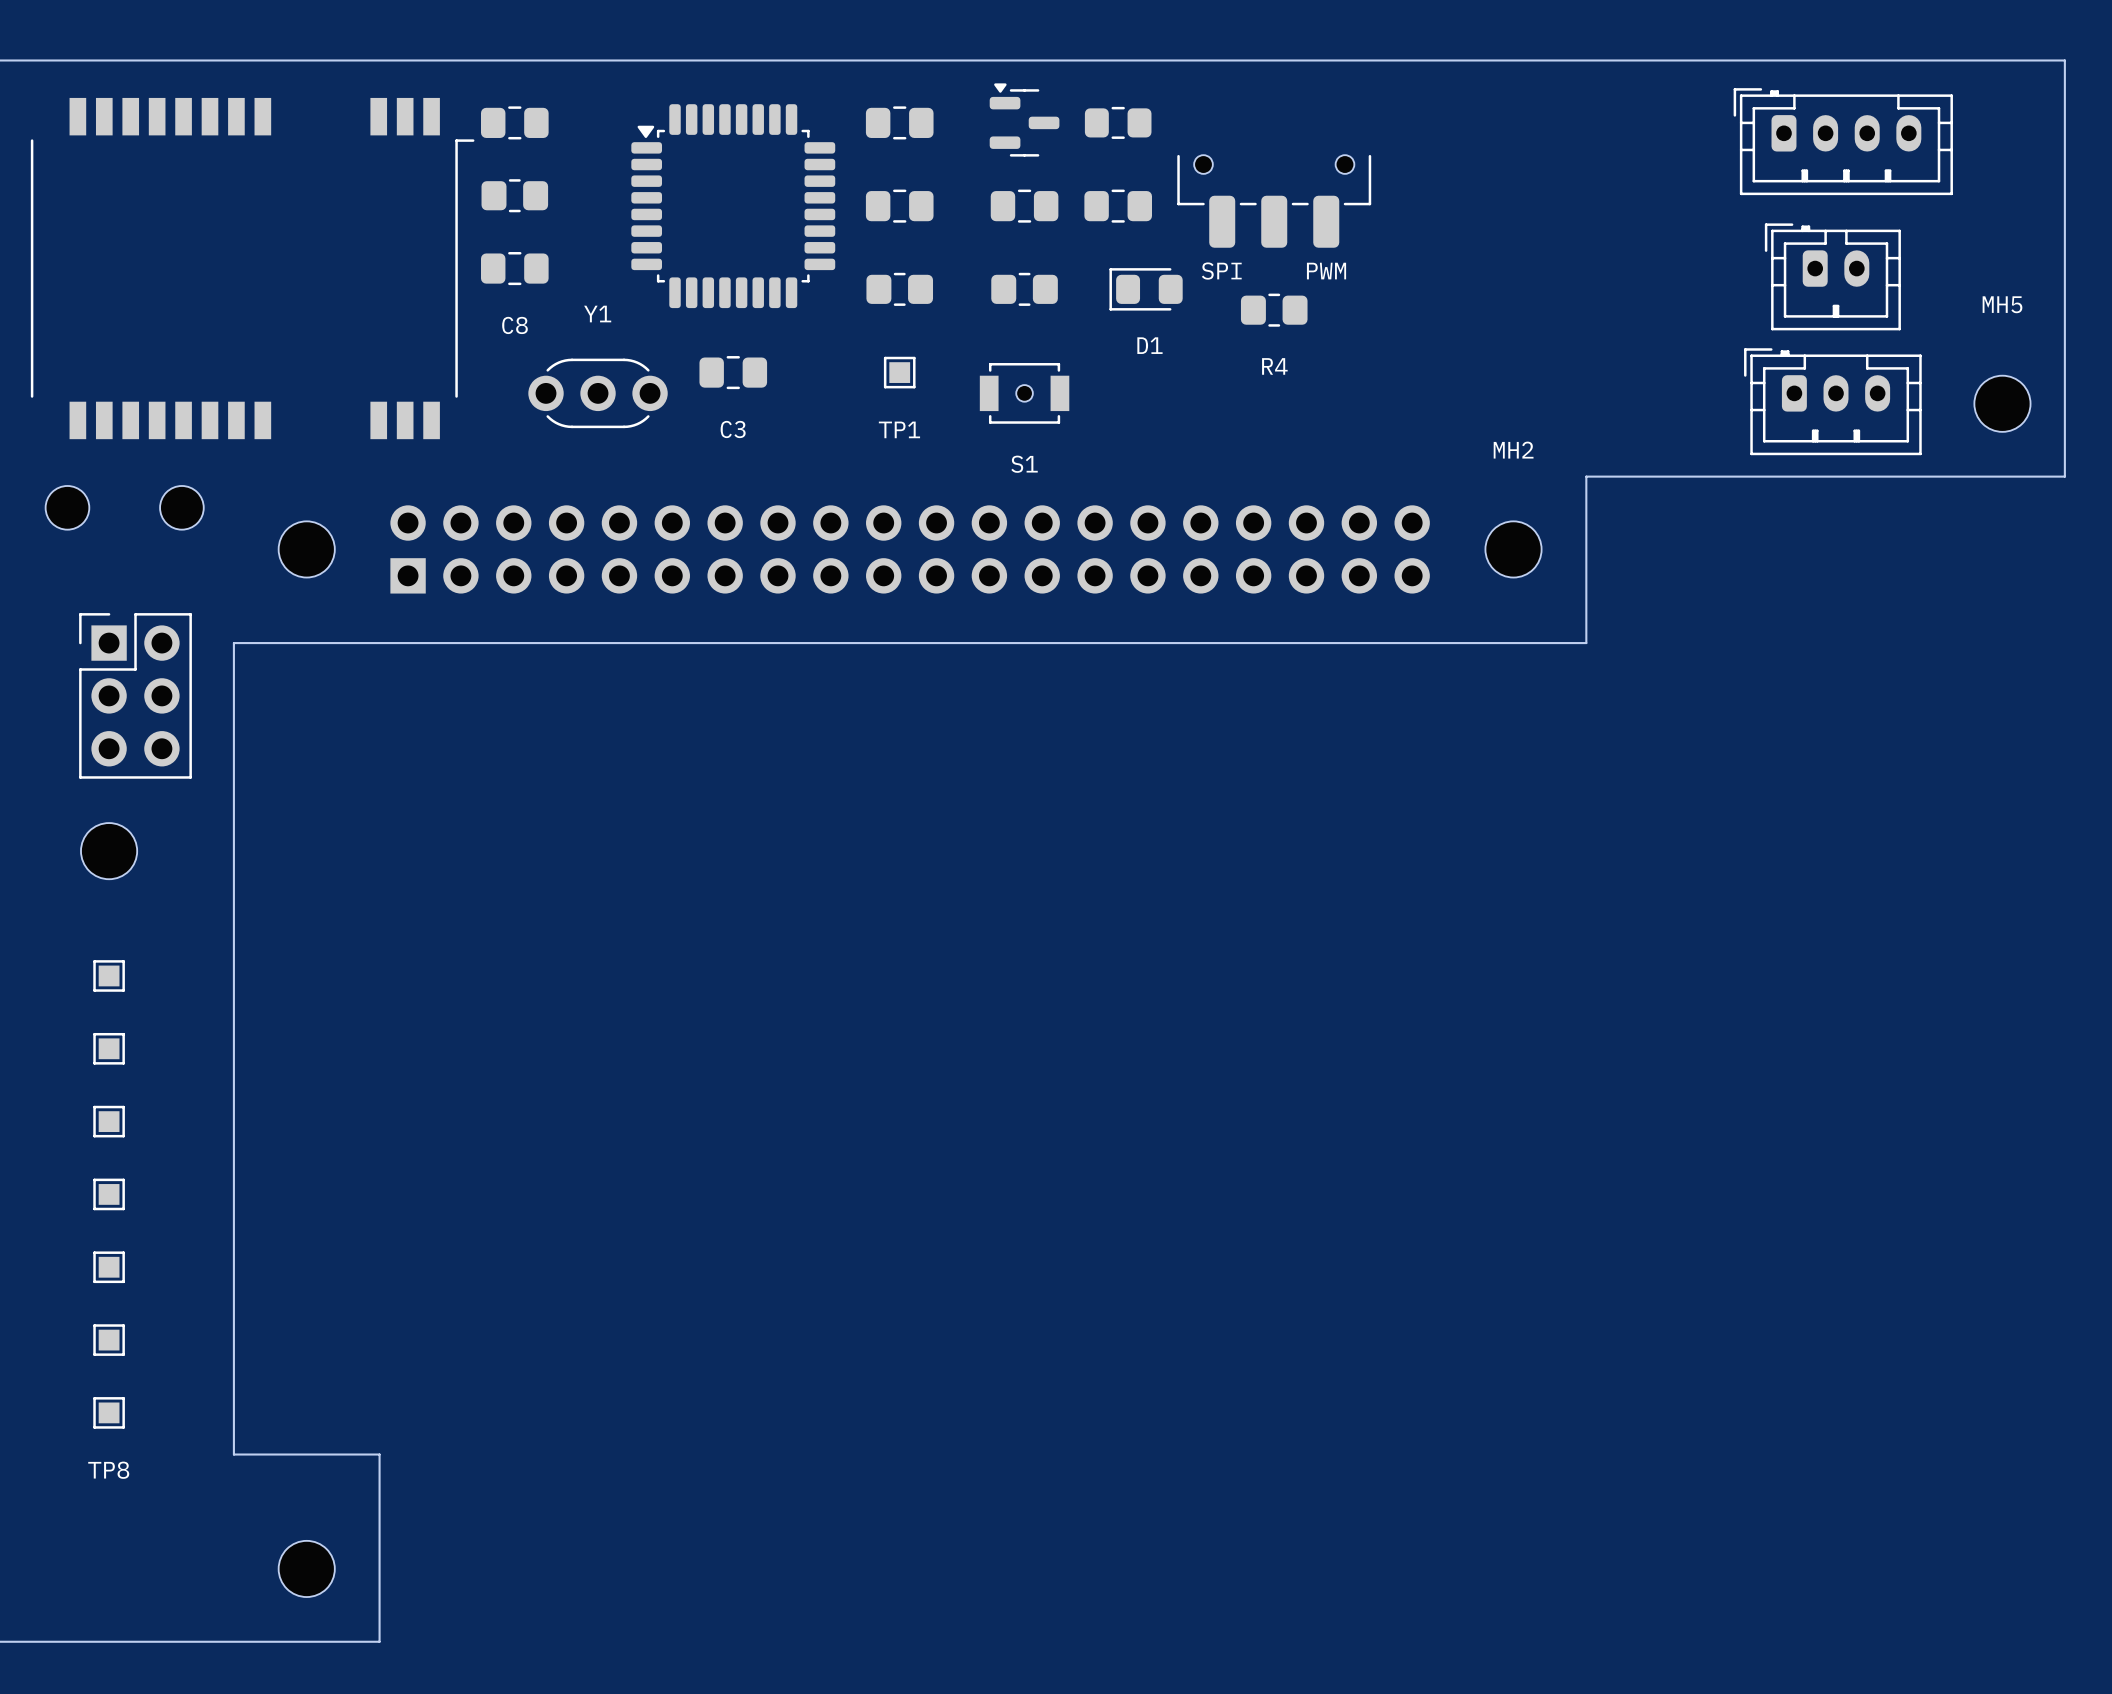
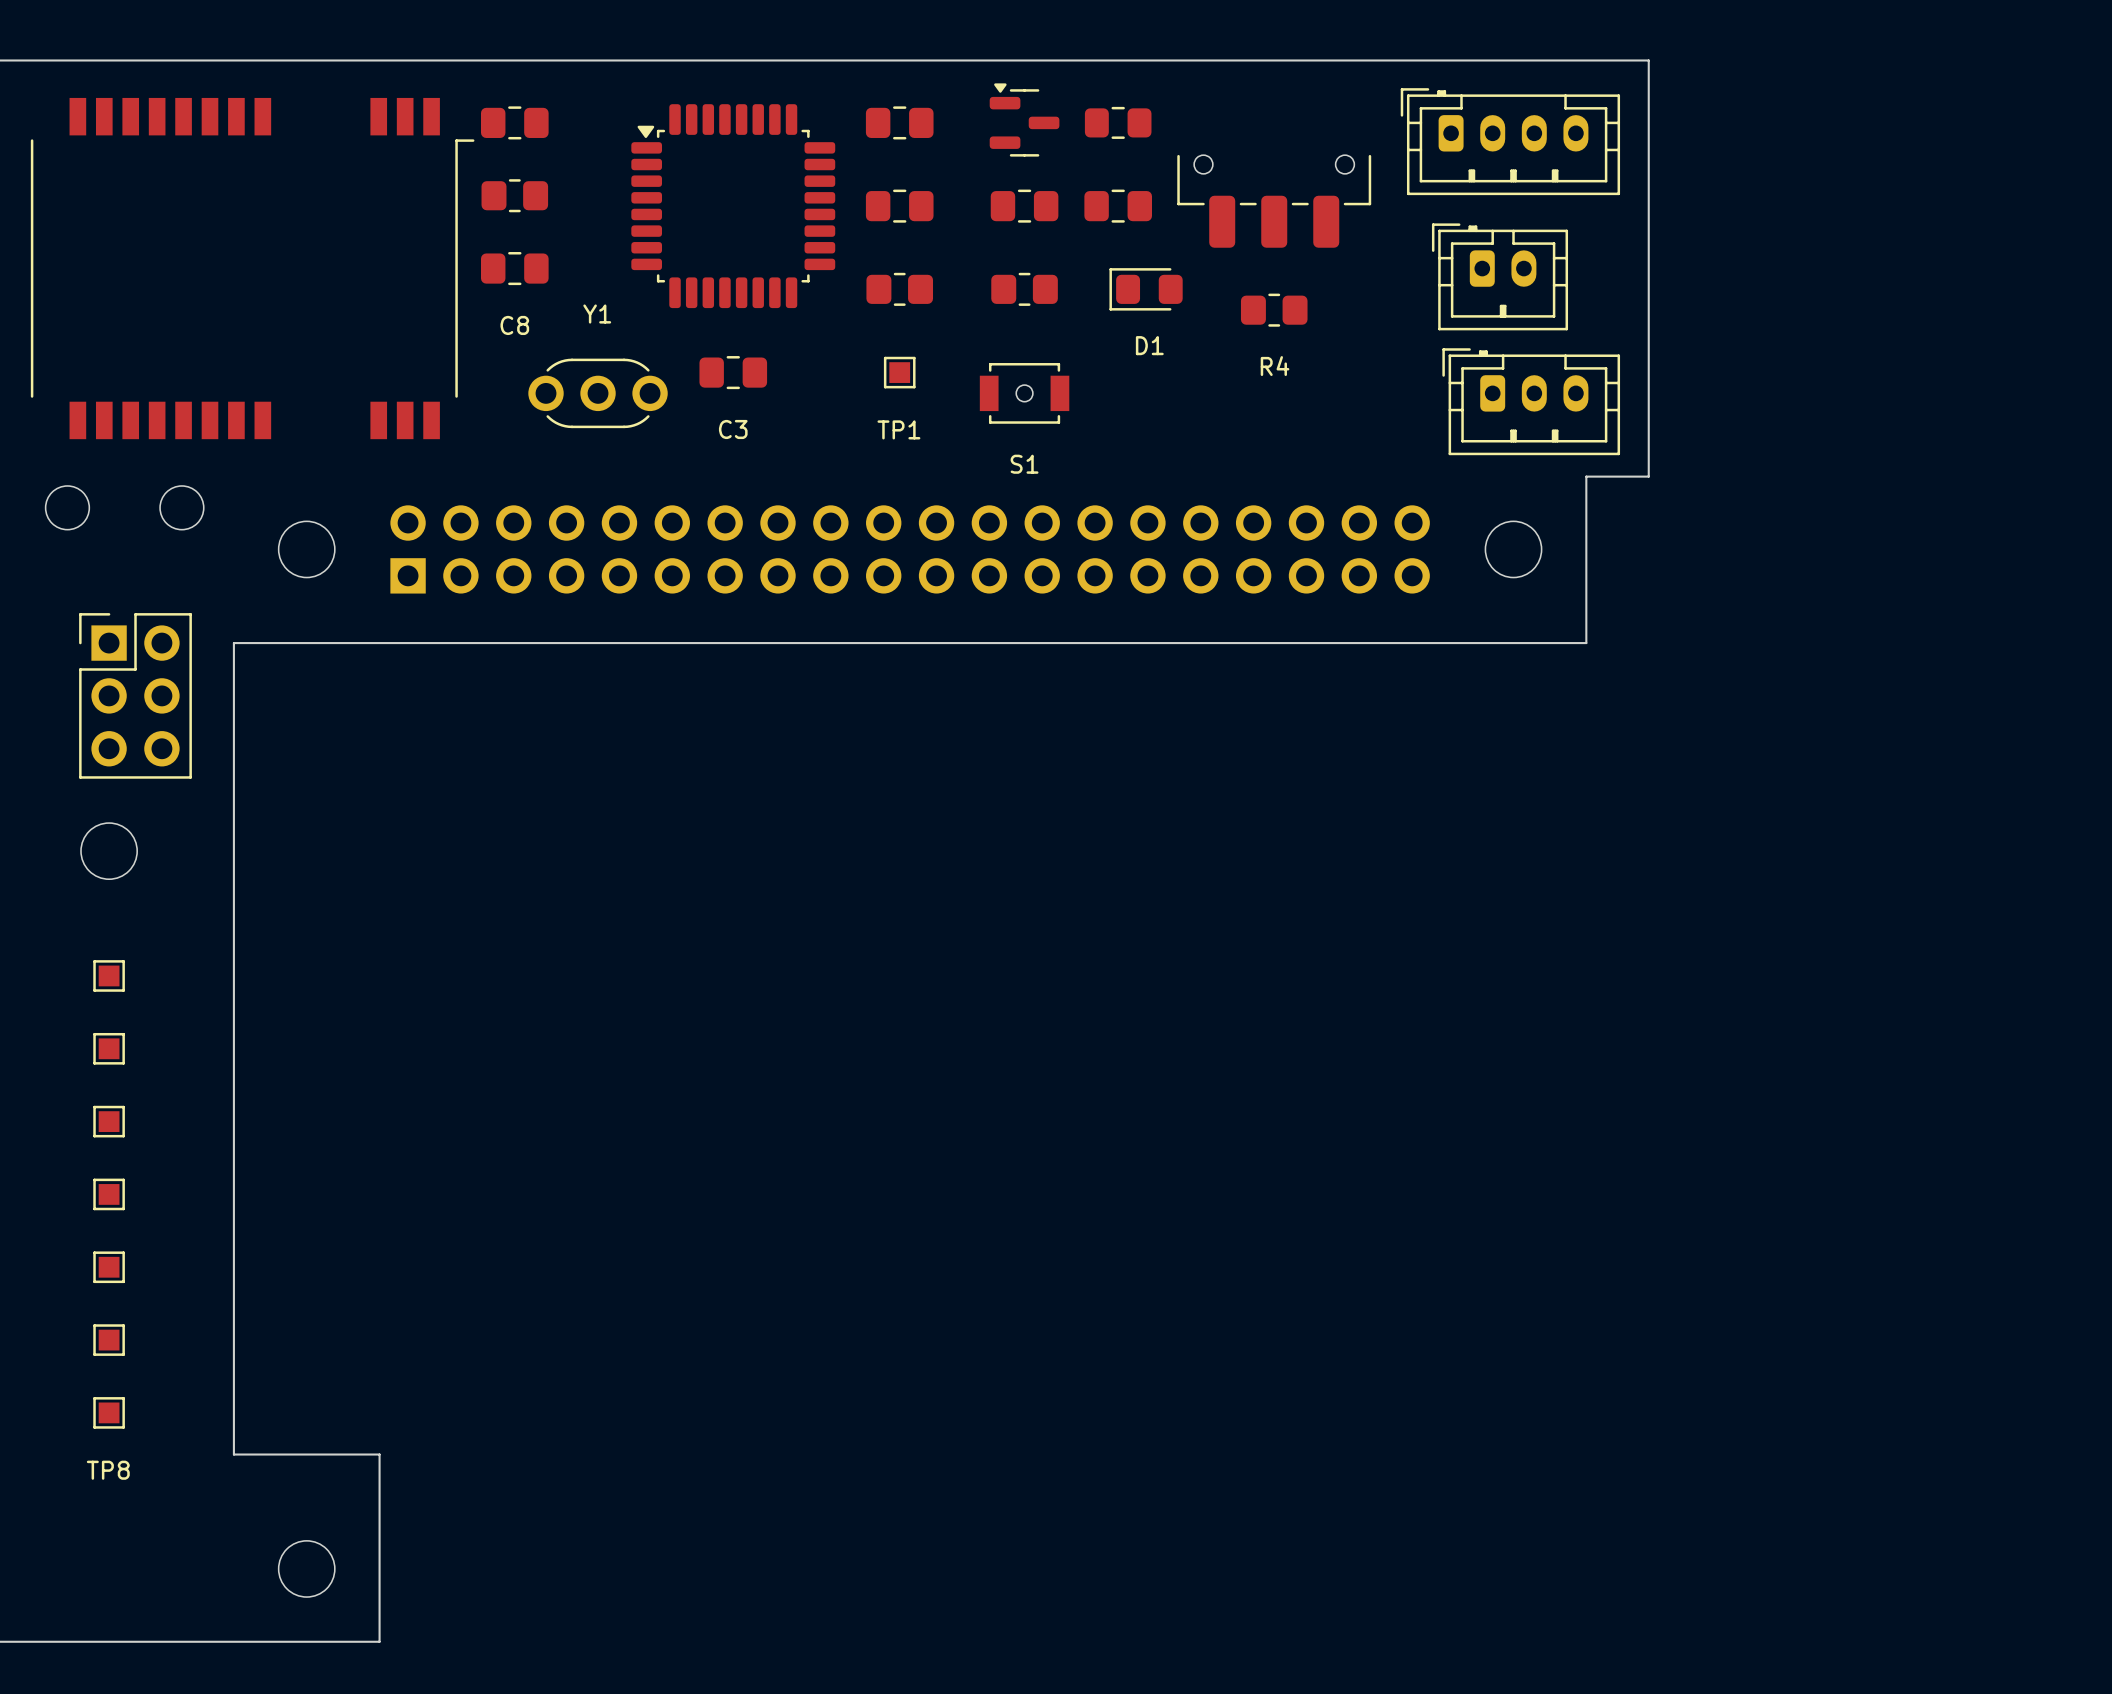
board edge: (1648, 60) (2064, 60) (2064, 476) (1648, 476) -> (1648, 60) (1648, 476)
part position: (1843, 141) -> (1510, 141)
text: SPI (1221, 271) -> none
text: PWM (1326, 271) -> none
part position: (1832, 276) -> (1499, 276)
part position: (1832, 401) -> (1531, 401)
MH5: (2002, 403) -> none
MH2 name: MH2 (1513, 450) -> none

